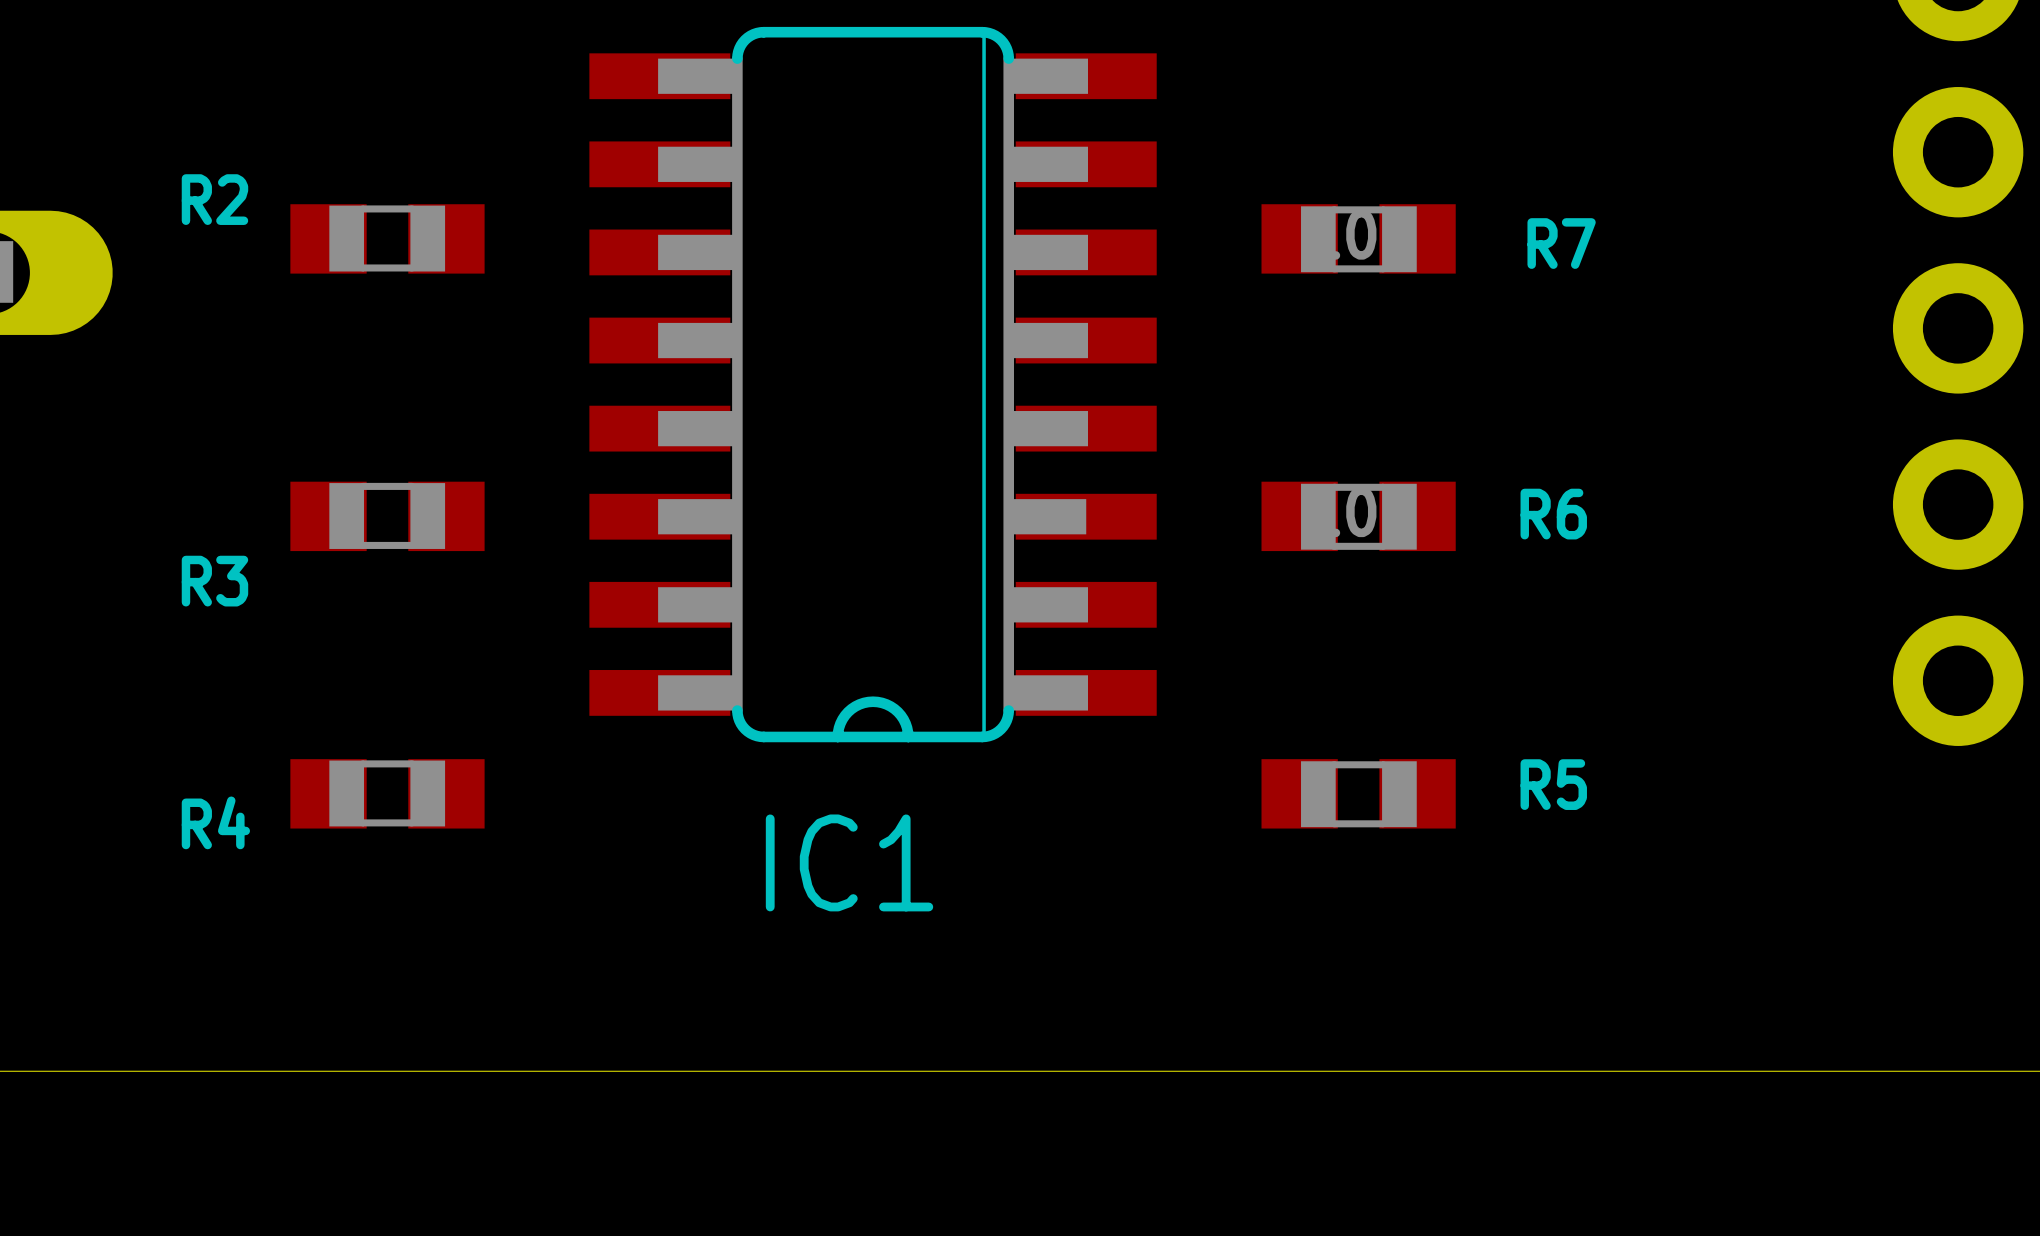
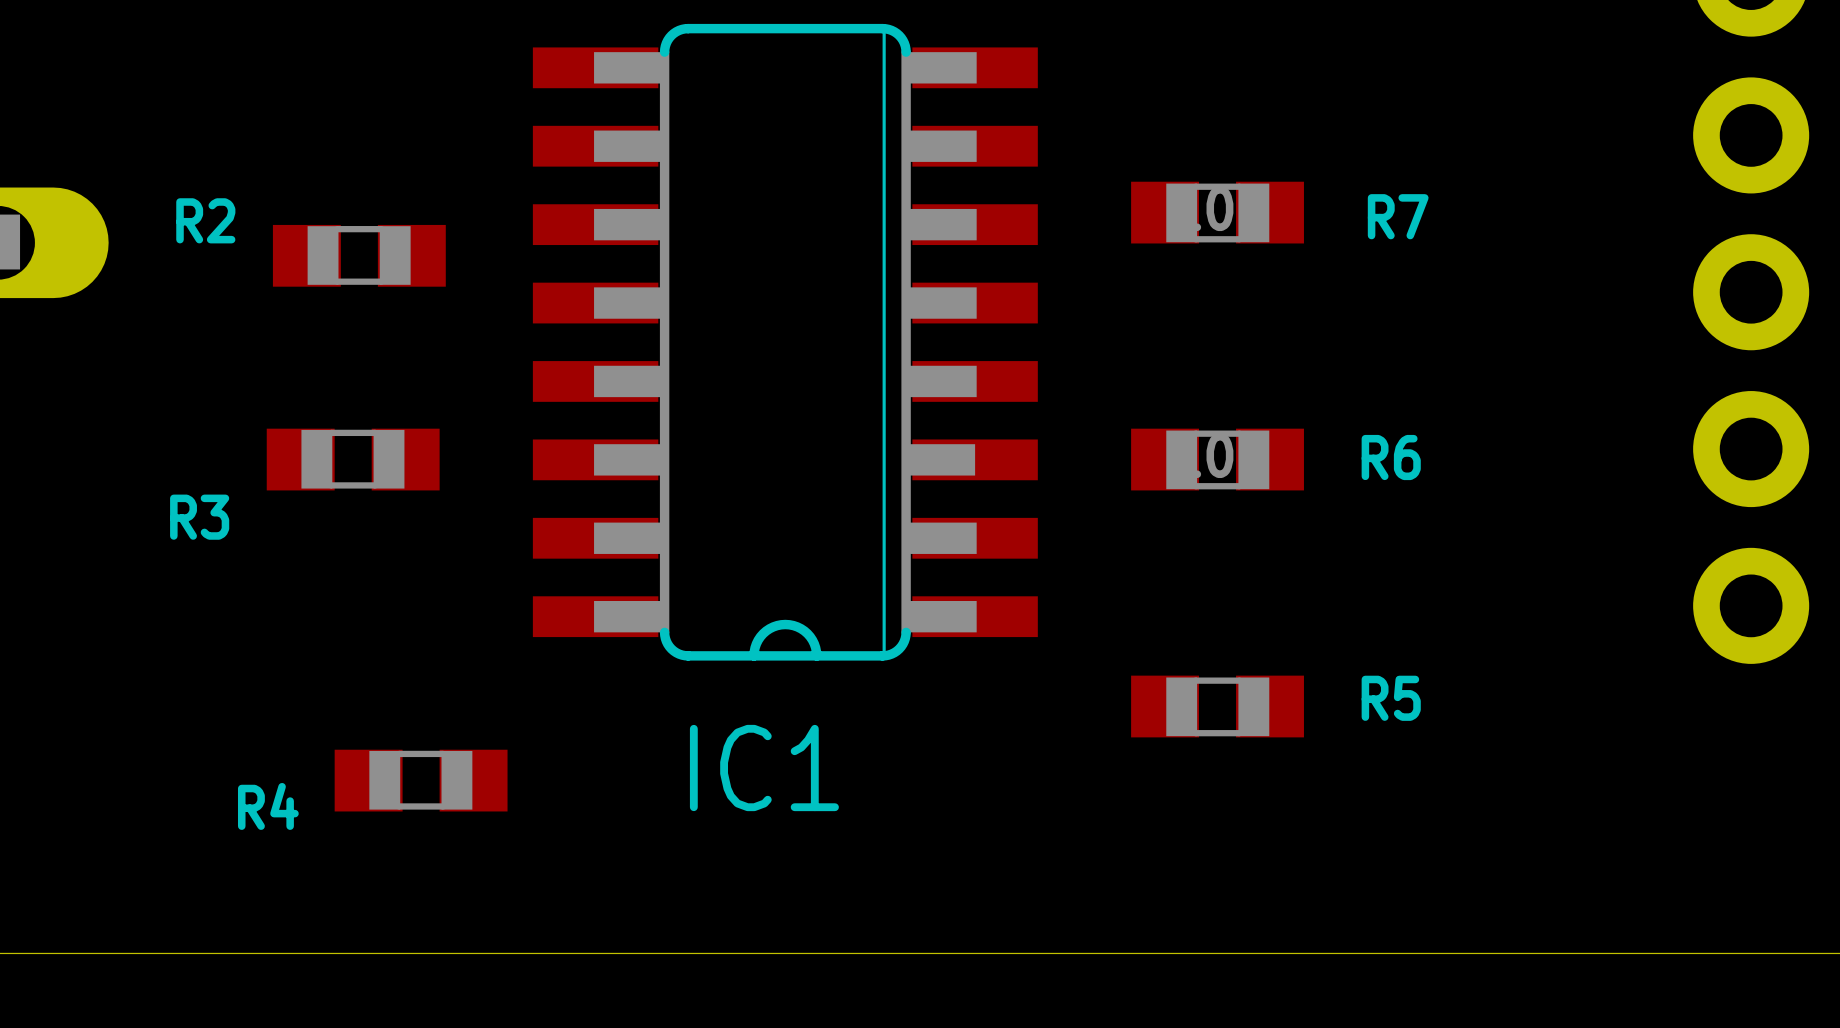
R2 position: (387, 238) -> (359, 255)
R4 position: (387, 793) -> (421, 780)

